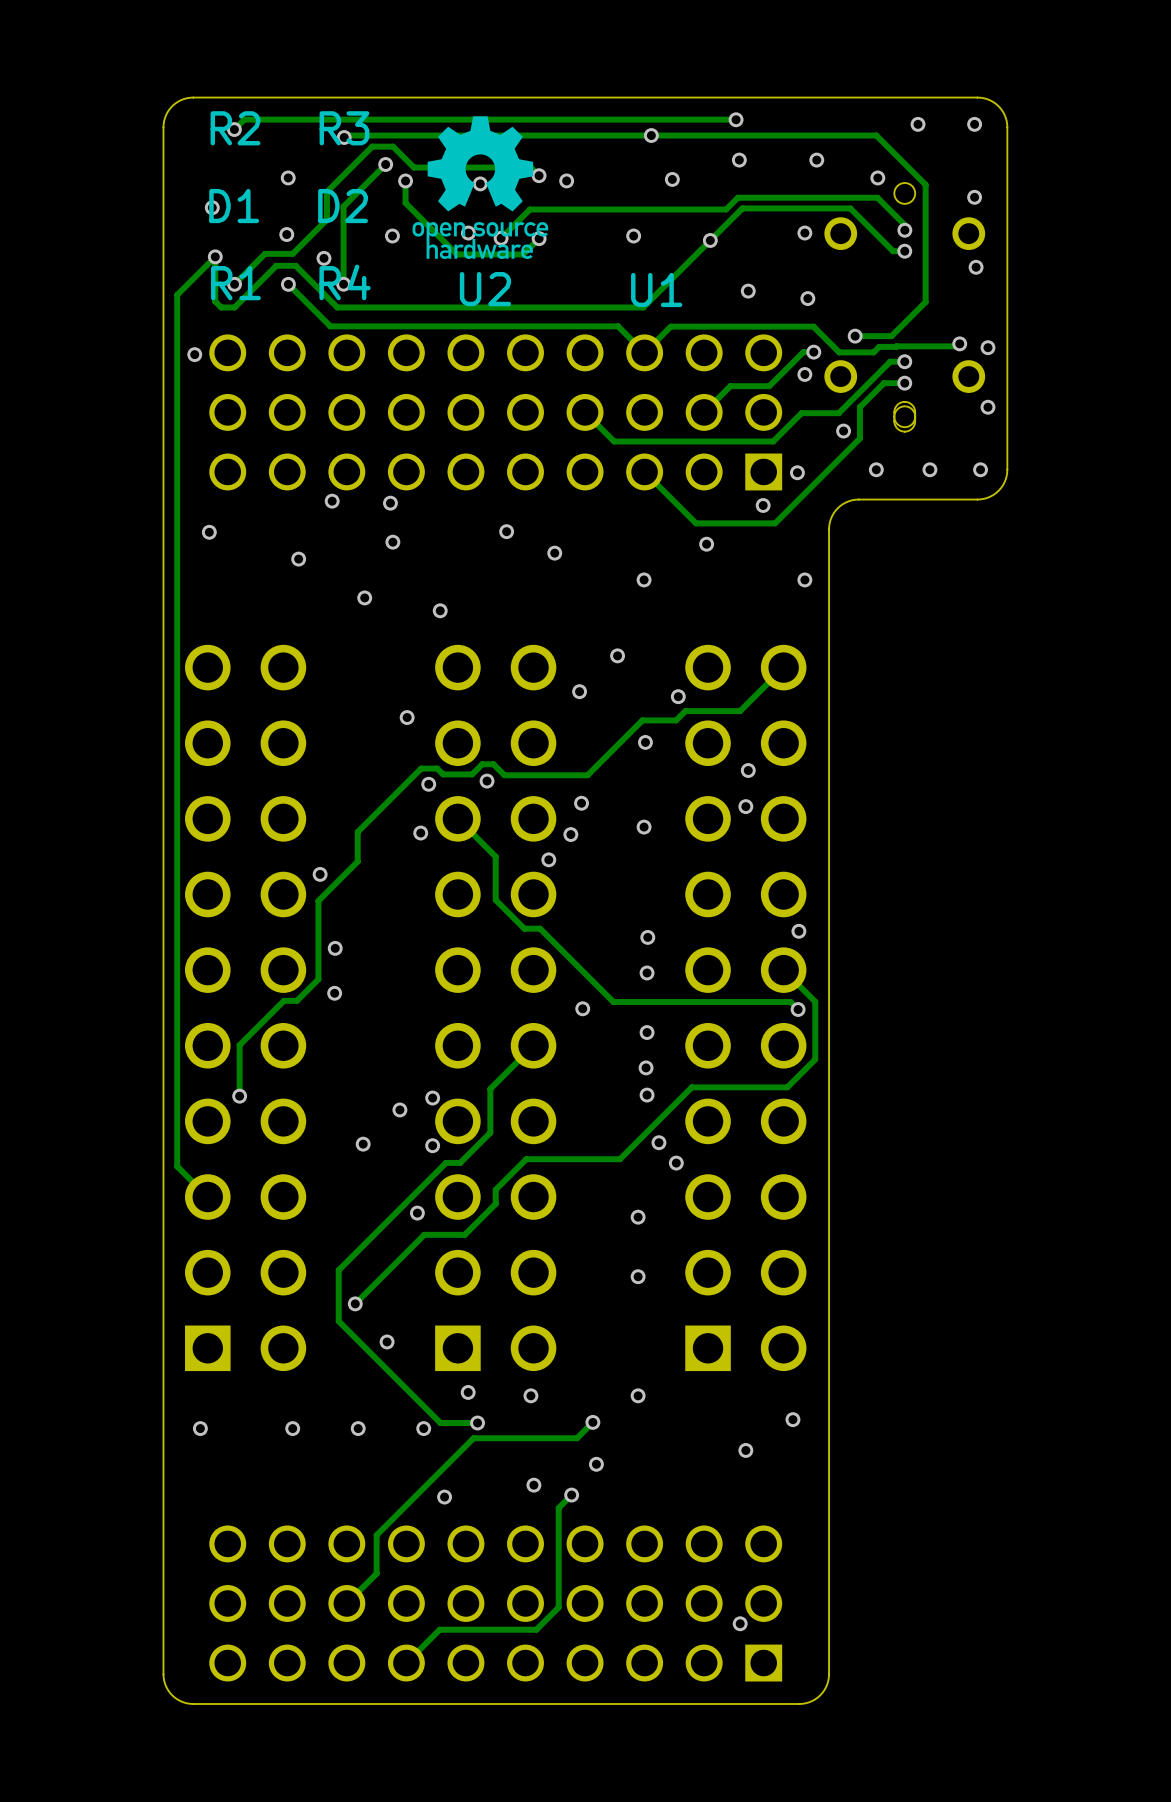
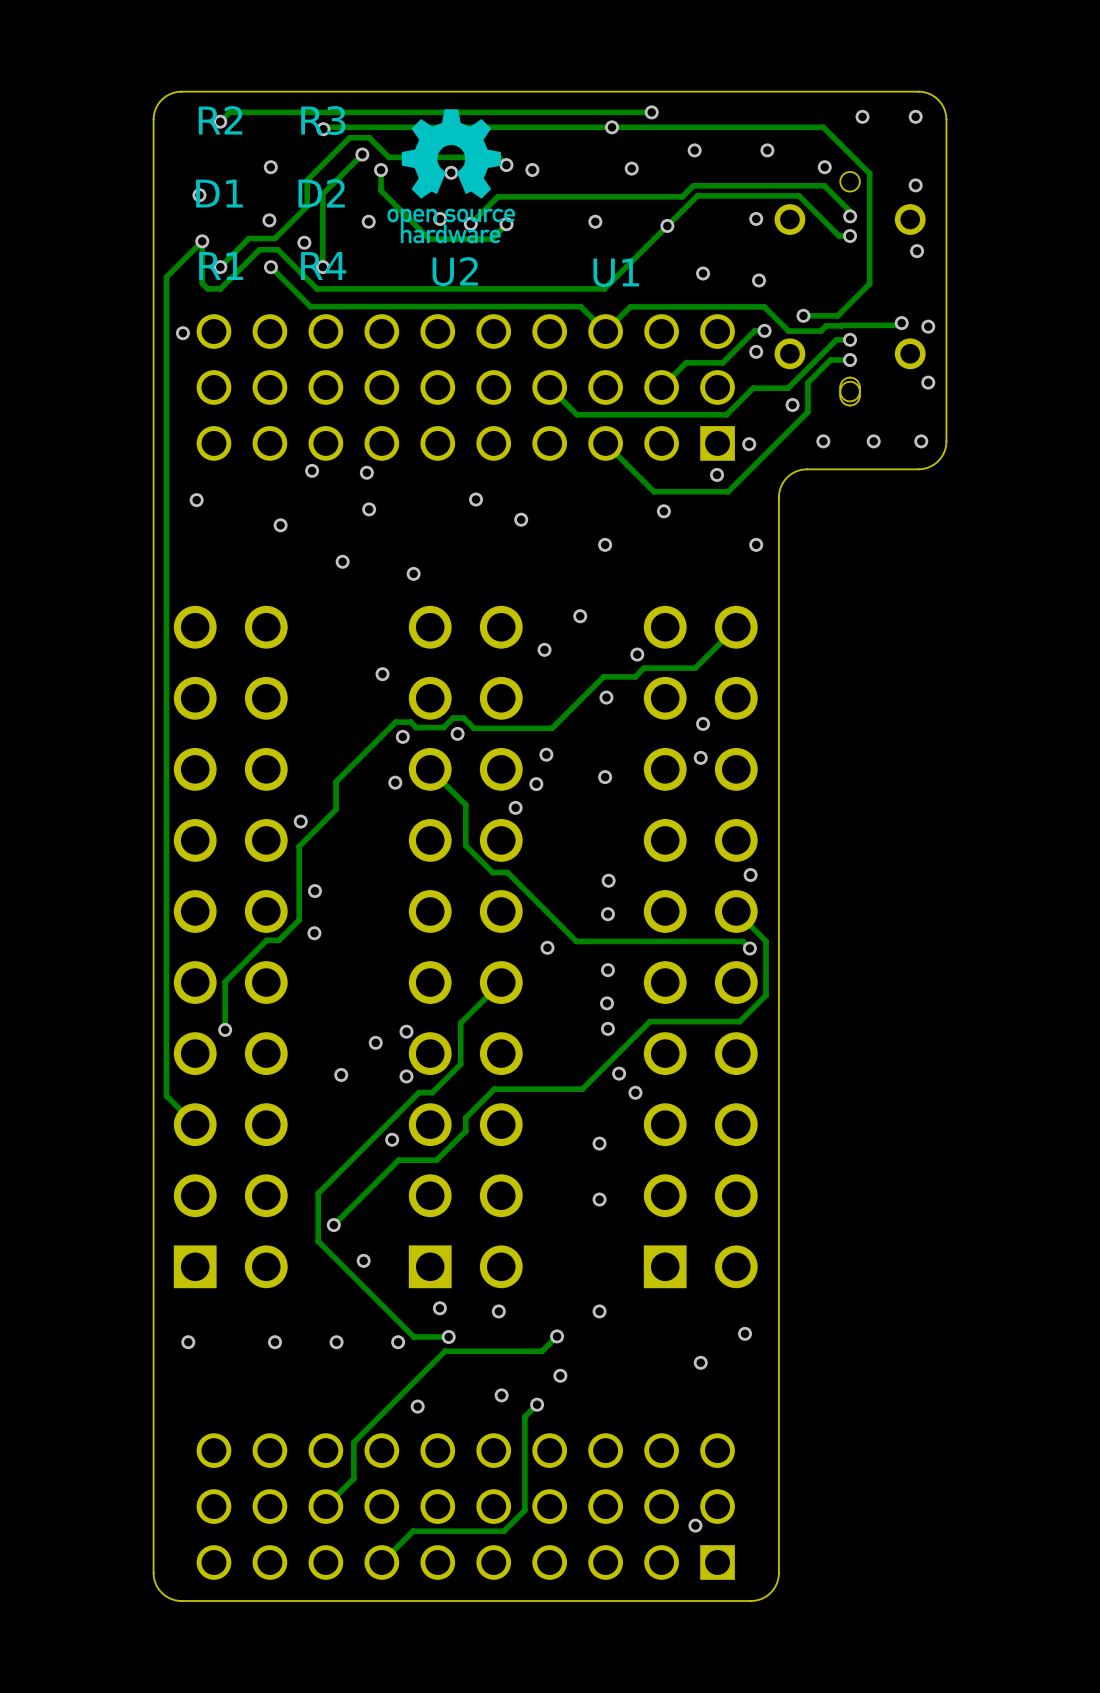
track: (735, 119) (693, 119) -> none
via position: (736, 119) -> (651, 112)

